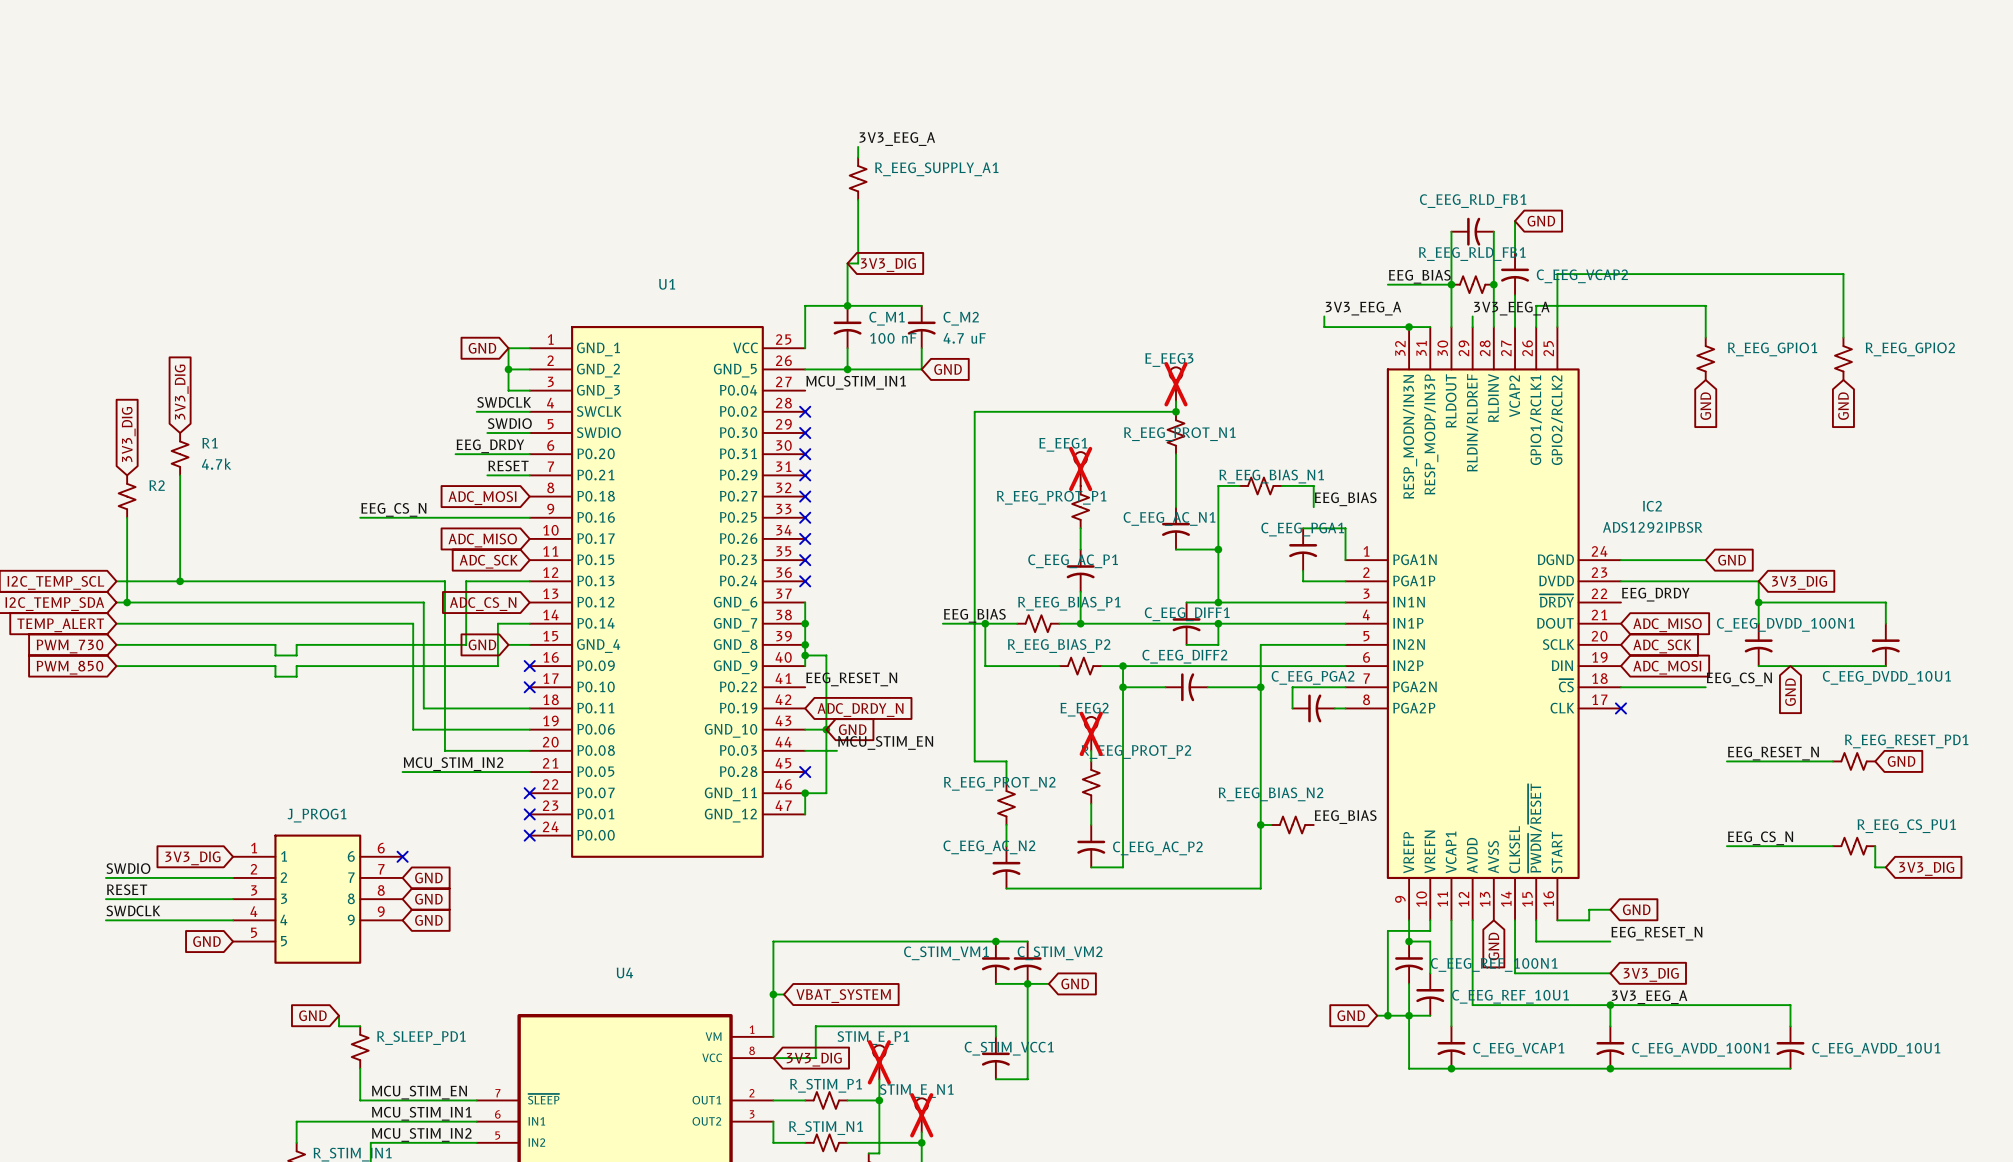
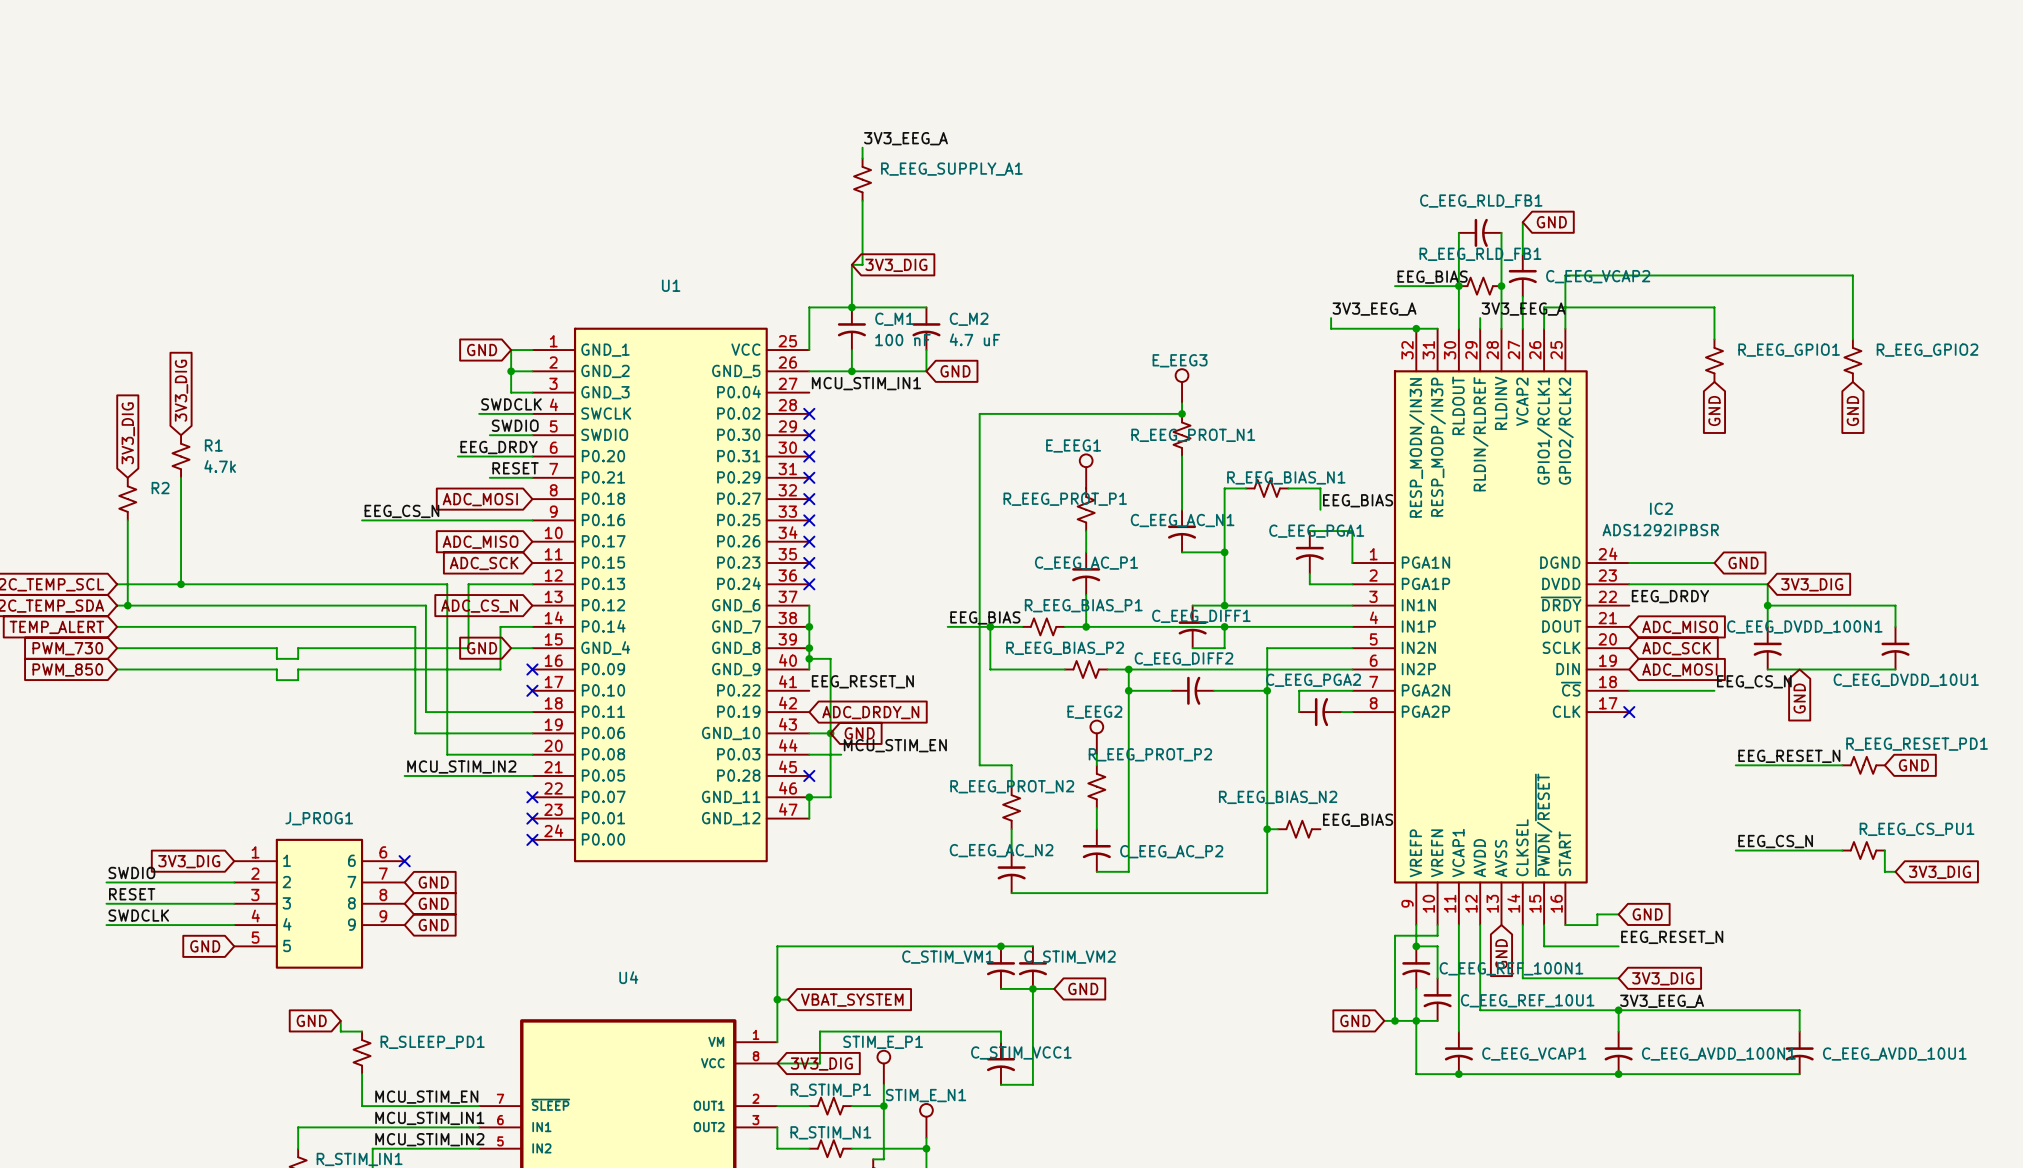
E_EEG3 do-not-place cross: (1176, 384) -> none
E_EEG1 do-not-place cross: (1080, 469) -> none
E_EEG2 do-not-place cross: (1091, 733) -> none
STIM_E_P1 do-not-place cross: (879, 1062) -> none
STIM_E_N1 do-not-place cross: (921, 1115) -> none

